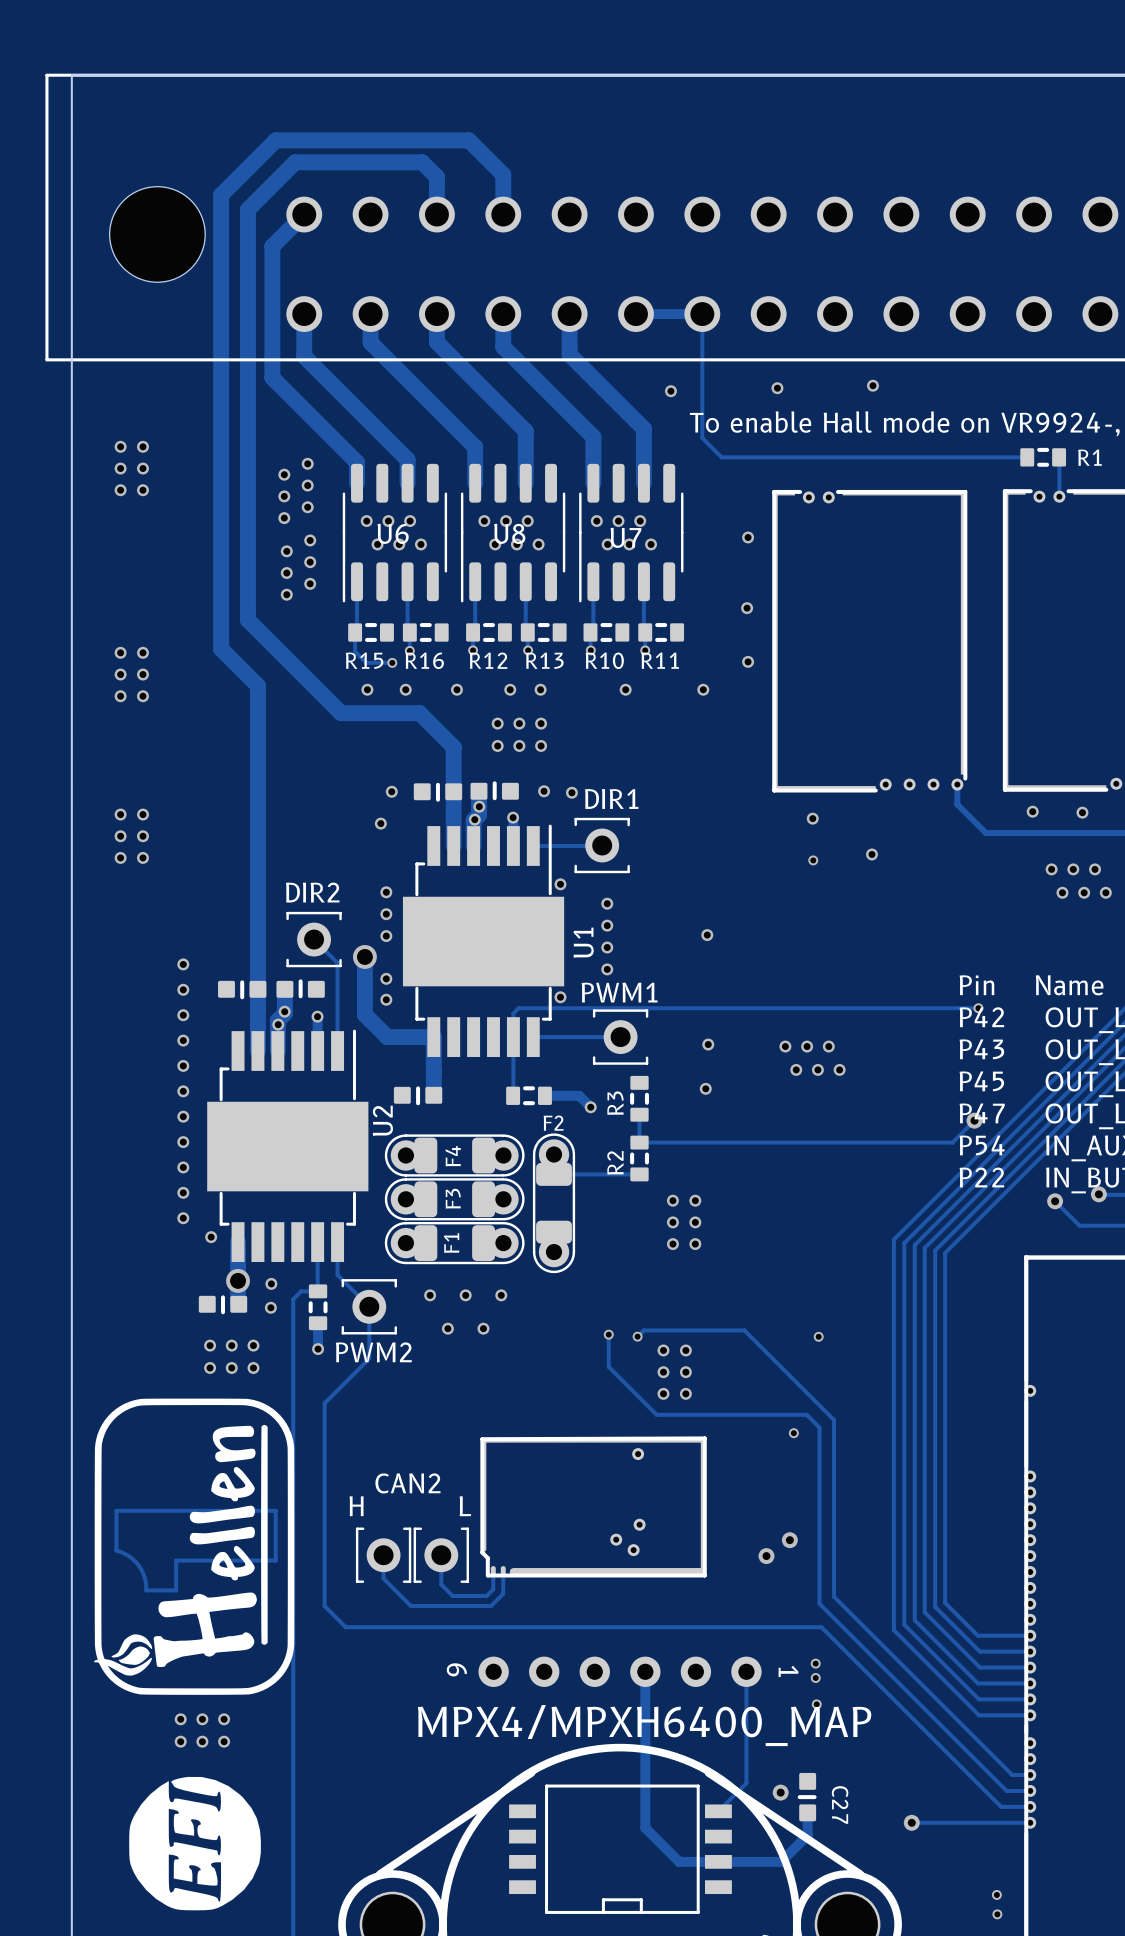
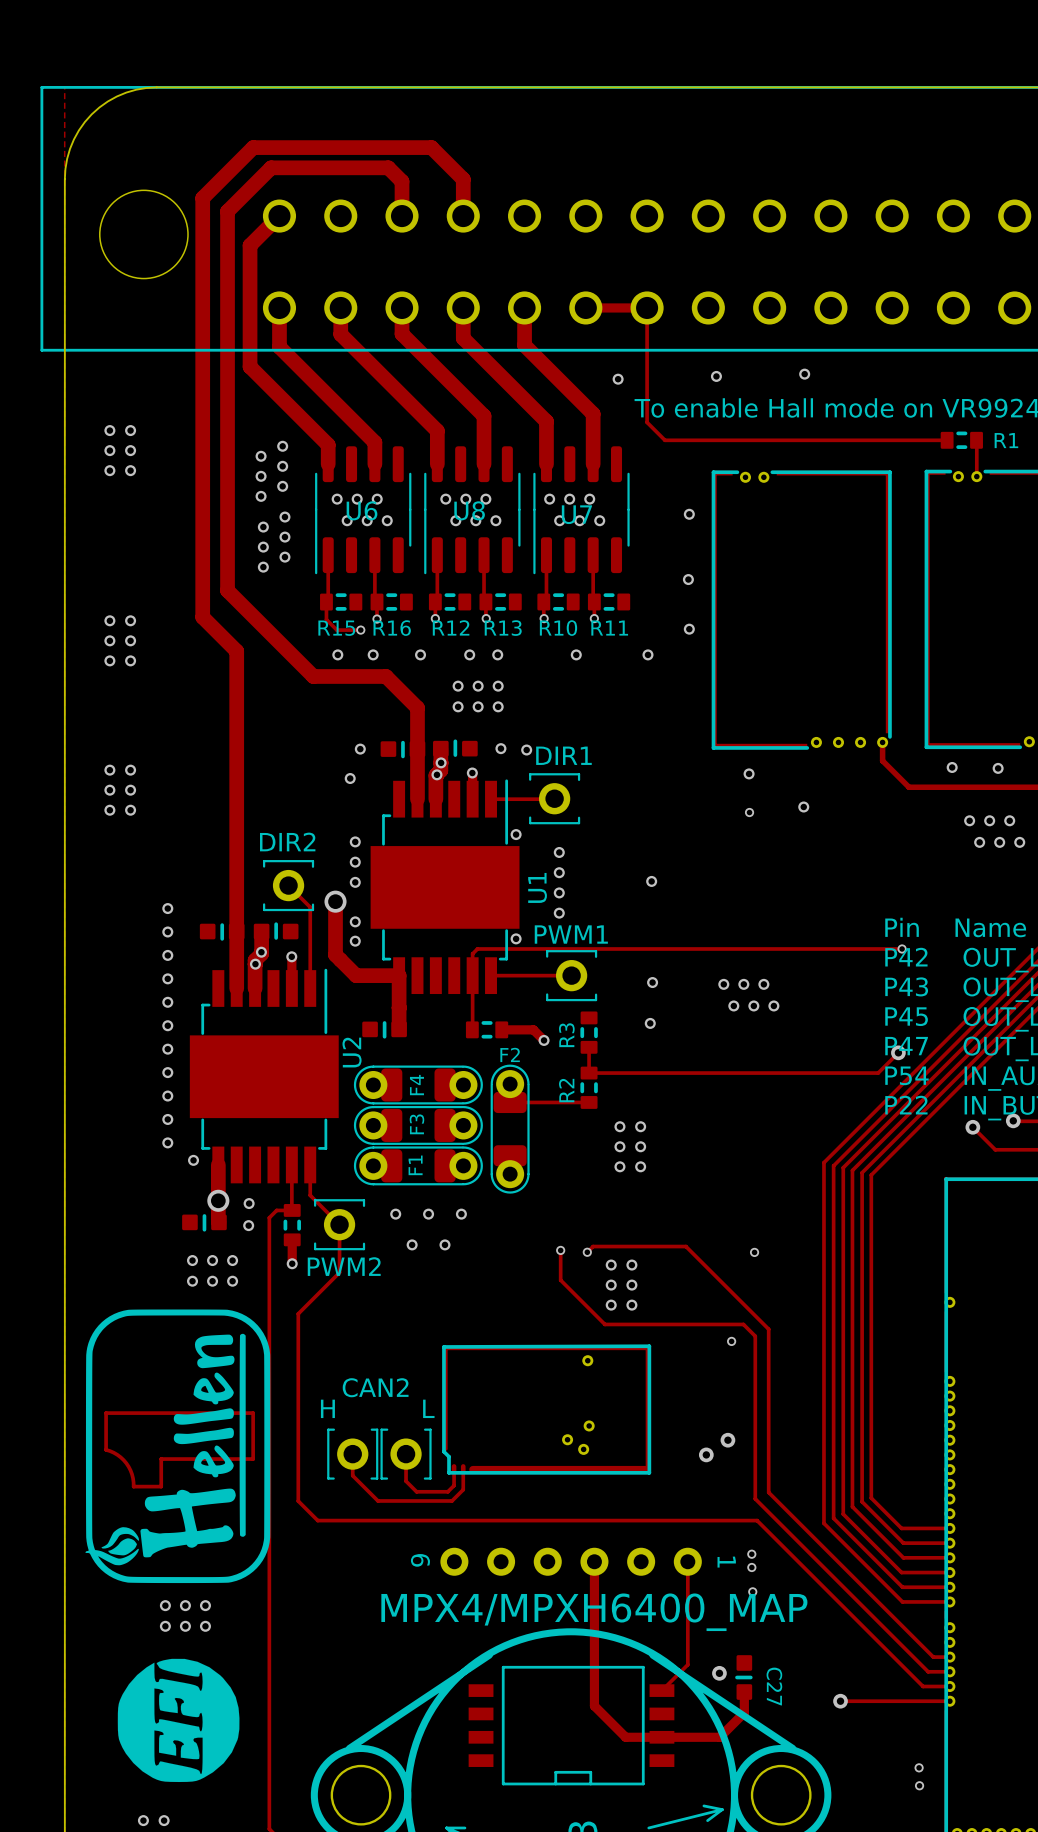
board edge: (171, 75) (71, 75) (71, 174) -> (156, 87) (126, 92) (107, 101) (91, 114) (78, 130) (70, 148) (64, 179)

